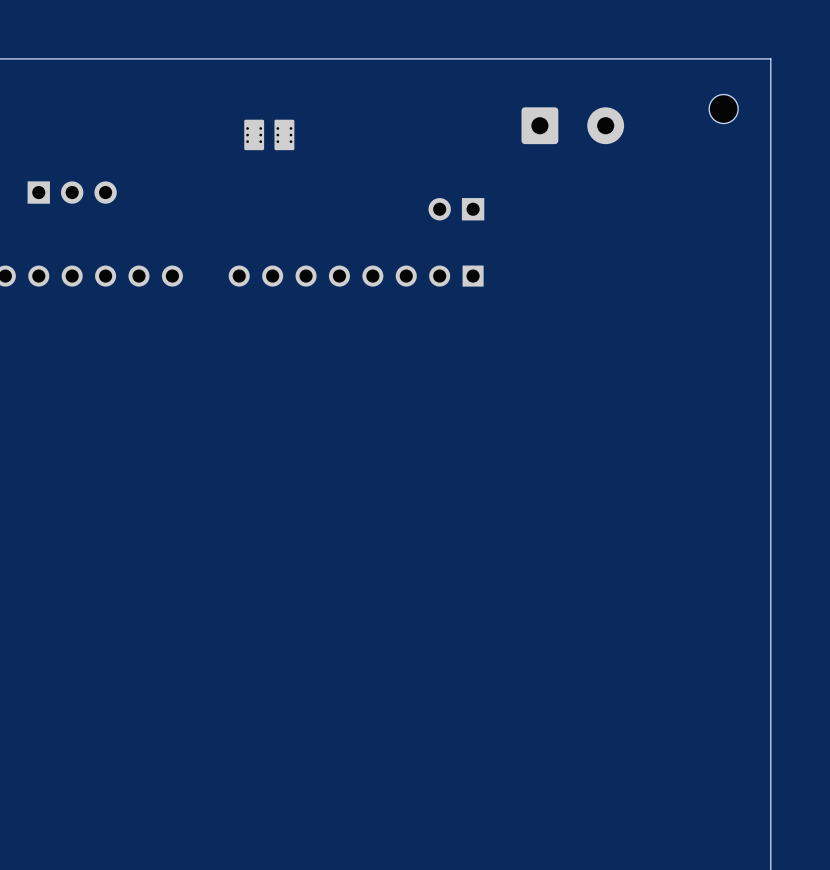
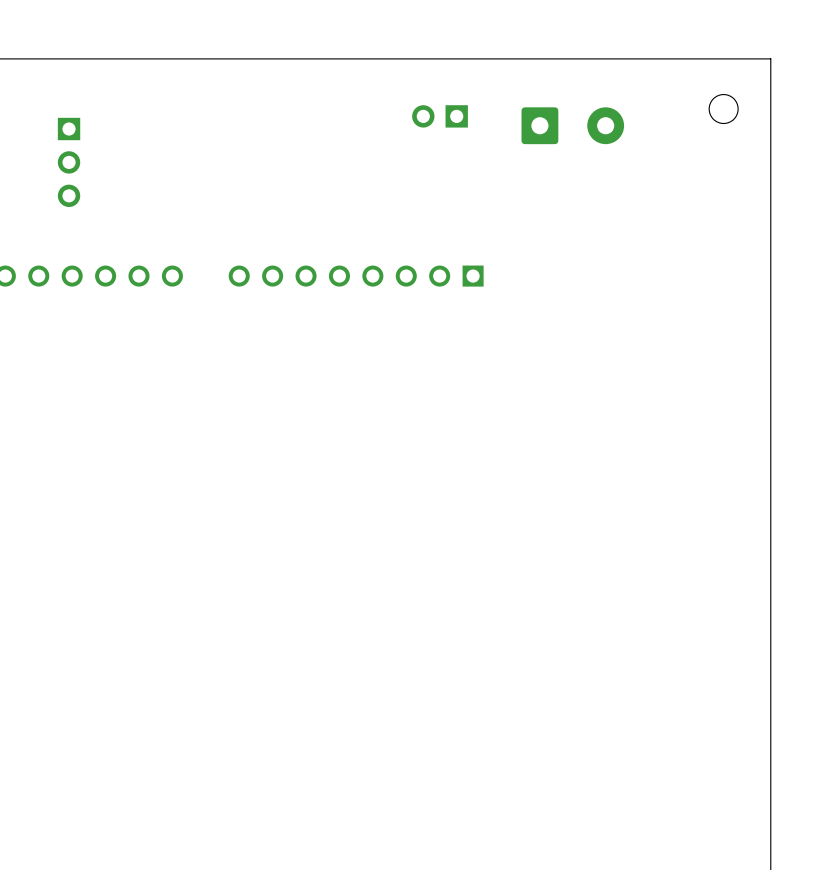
part: (269, 134) -> none
part rotation: 0° (72, 192) -> 90° clockwise (69, 162)
part position: (456, 209) -> (440, 116)

